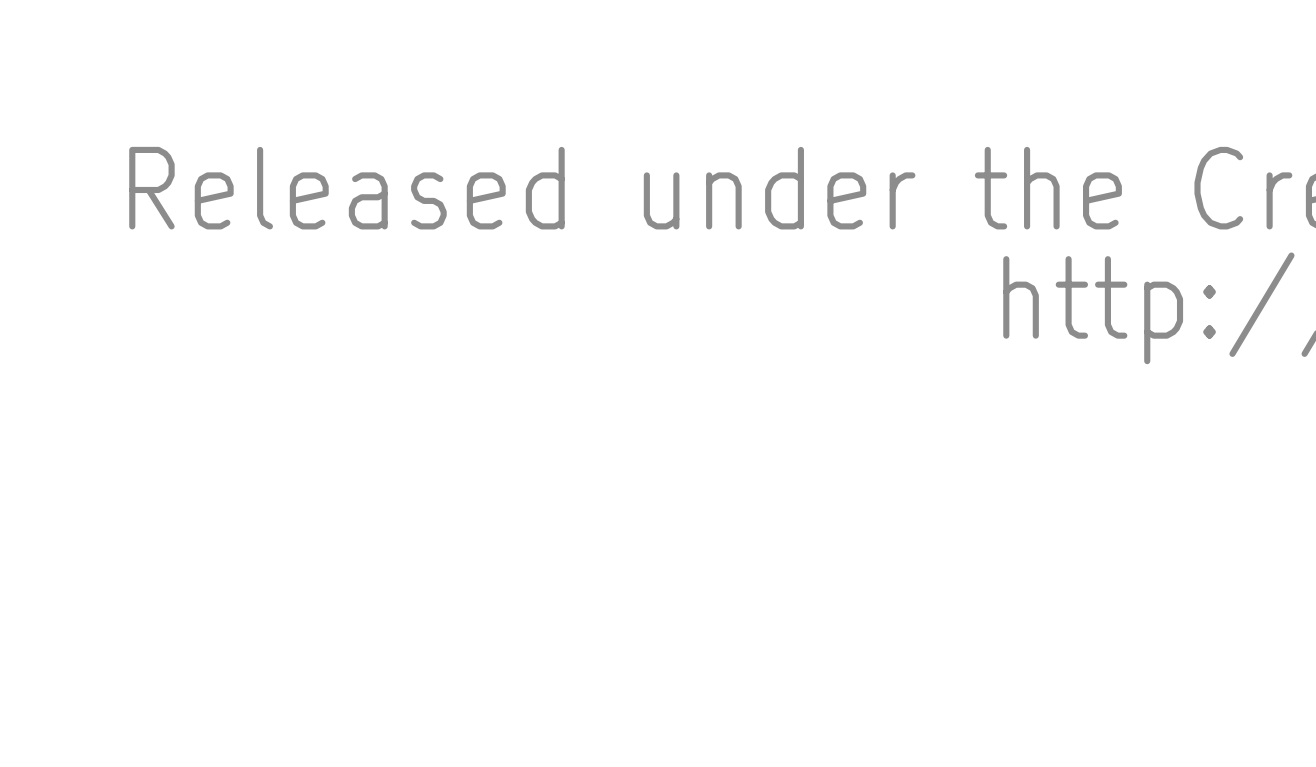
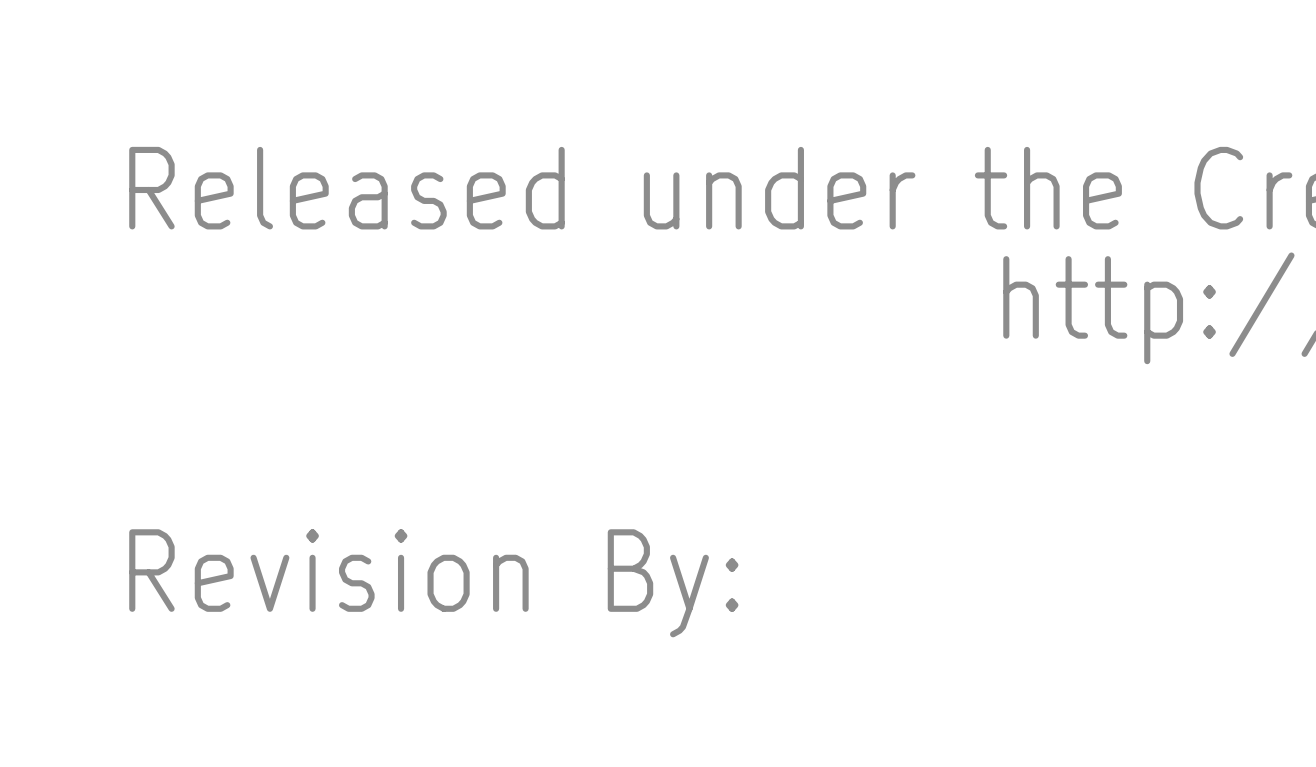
drawing: none -> [129, 529, 739, 638]

